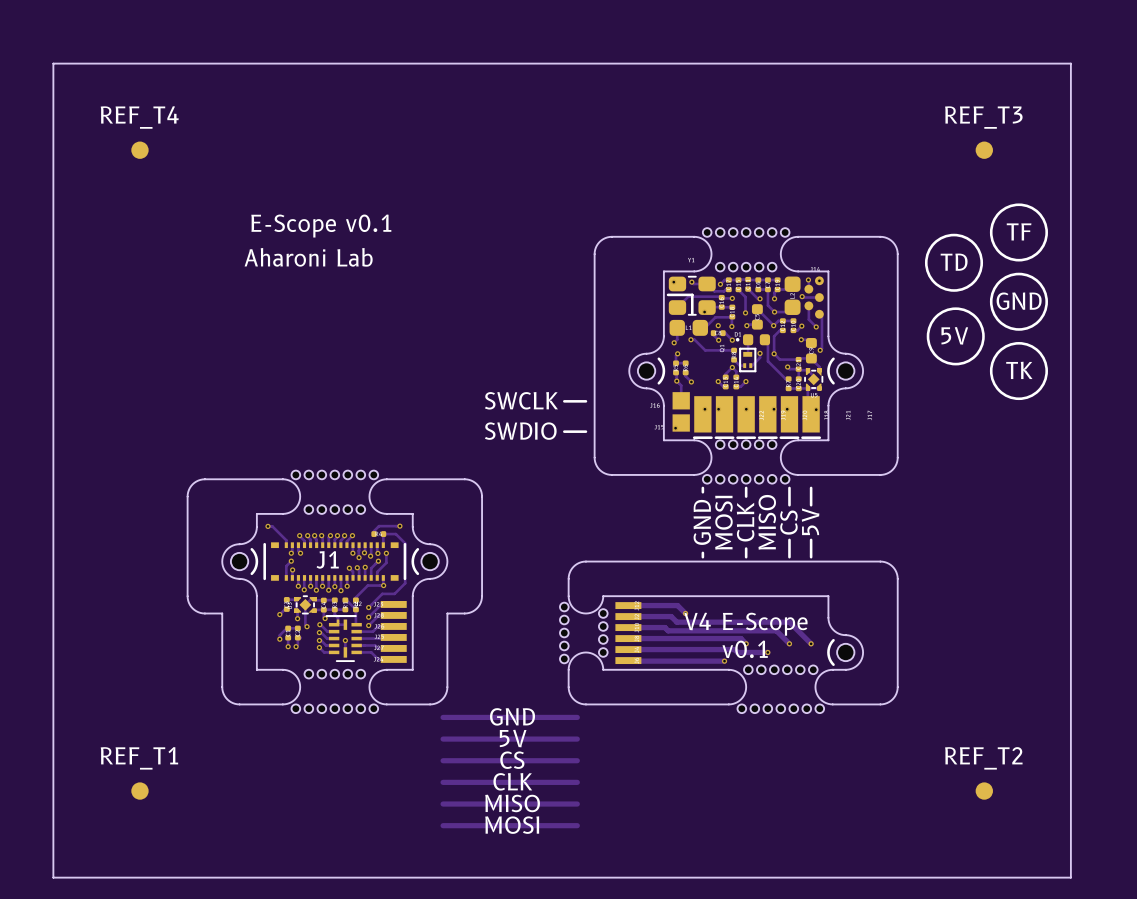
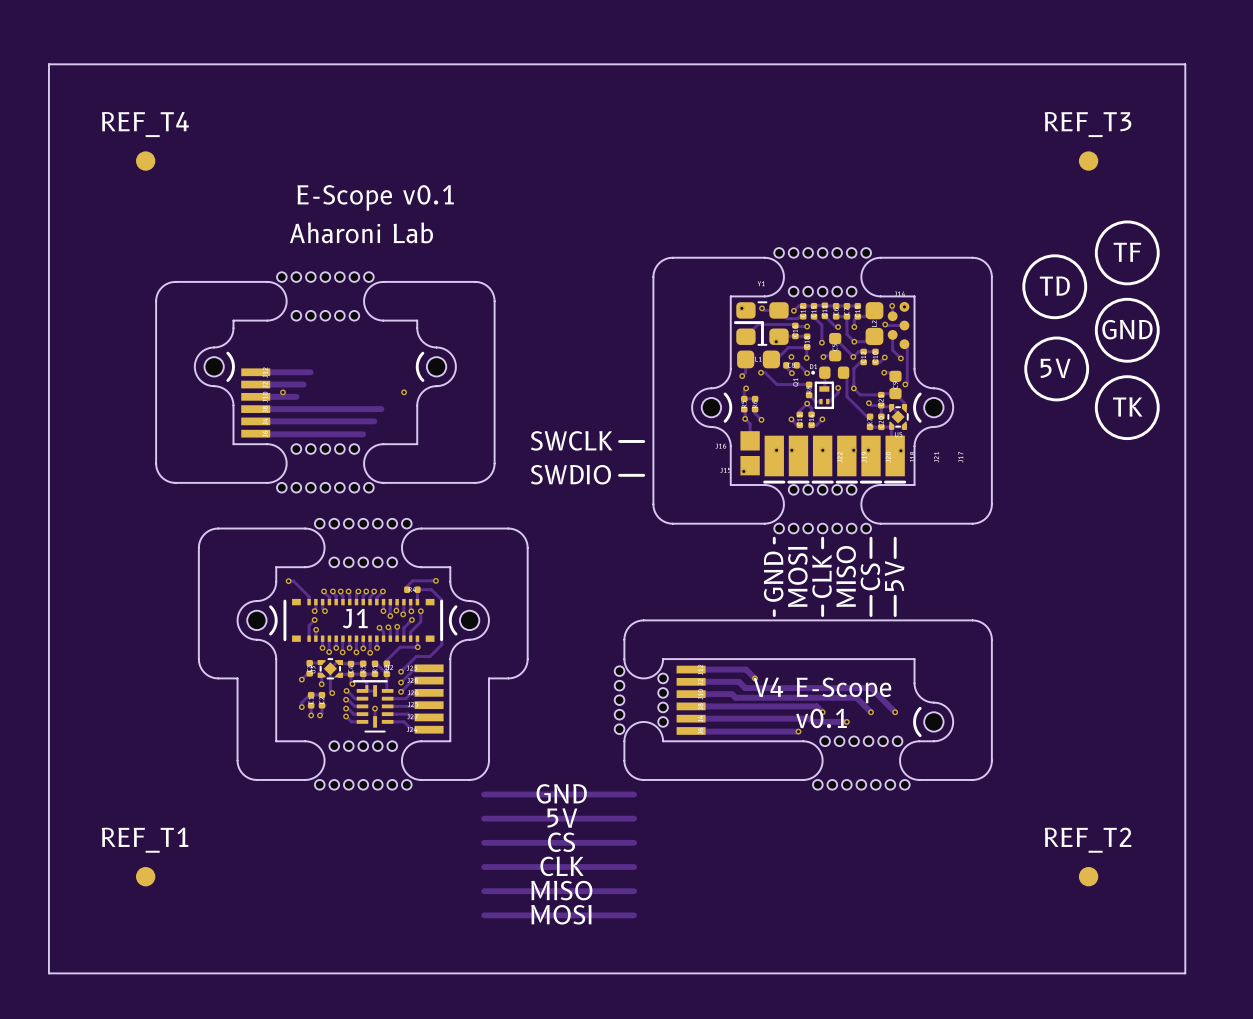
text position: E-Scope v0.1 (321, 226) -> E-Scope v0.1 (375, 197)
part: none -> (281, 277)
part: none -> (296, 277)
part: none -> (310, 277)
part: none -> (325, 277)
part: none -> (339, 277)
part: none -> (354, 277)
part: none -> (368, 277)
text position: Aharoni Lab (308, 257) -> Aharoni Lab (361, 232)
board edge: none -> (175, 281) (269, 282) (279, 285) (284, 291) (286, 306) (279, 316) (269, 320) (233, 320) (232, 333) (229, 339) (221, 346) (202, 351) (196, 359) (194, 366) (196, 374) (202, 382) (221, 387) (230, 395) (233, 405) (233, 444) (269, 444) (282, 451) (286, 458) (286, 468) (277, 480) (267, 482) (175, 482) (165, 480) (158, 473) (156, 463) (156, 298) (161, 287) (175, 281)
board edge: none -> (383, 281) (477, 282) (487, 285) (492, 291) (494, 301) (494, 463) (492, 473) (484, 480) (475, 482) (383, 482) (373, 480) (366, 473) (364, 458) (373, 446) (383, 444) (417, 444) (417, 405) (419, 395) (429, 387) (448, 382) (455, 369) (454, 359) (448, 351) (429, 346) (421, 339) (417, 333) (417, 320) (380, 320) (368, 313) (364, 303) (365, 293) (371, 285) (383, 281)
part: none -> (296, 315)
part: none -> (310, 315)
part: none -> (325, 315)
part: none -> (339, 315)
part: none -> (354, 315)
line: none -> (227, 353) (233, 366) (227, 380)
line: none -> (422, 353) (417, 366) (422, 380)
part: none -> (214, 366)
part: none -> (436, 366)
track: none -> (255, 372) (310, 372)
part: none -> (255, 372)
track: none -> (255, 384) (303, 384)
part: none -> (255, 384)
via: none -> (283, 392)
via: none -> (404, 392)
track: none -> (255, 396) (296, 396)
part: none -> (255, 396)
track: none -> (255, 409) (381, 409)
part: none -> (255, 409)
track: none -> (255, 421) (374, 421)
part: none -> (255, 421)
track: none -> (255, 433) (363, 434)
part: none -> (255, 433)
part: none -> (296, 449)
part: none -> (310, 449)
part: none -> (325, 449)
part: none -> (339, 449)
part: none -> (354, 449)
part: none -> (281, 487)
part: none -> (296, 487)
part: none -> (310, 487)
part: none -> (325, 487)
part: none -> (339, 487)
part: none -> (354, 487)
part: none -> (368, 487)

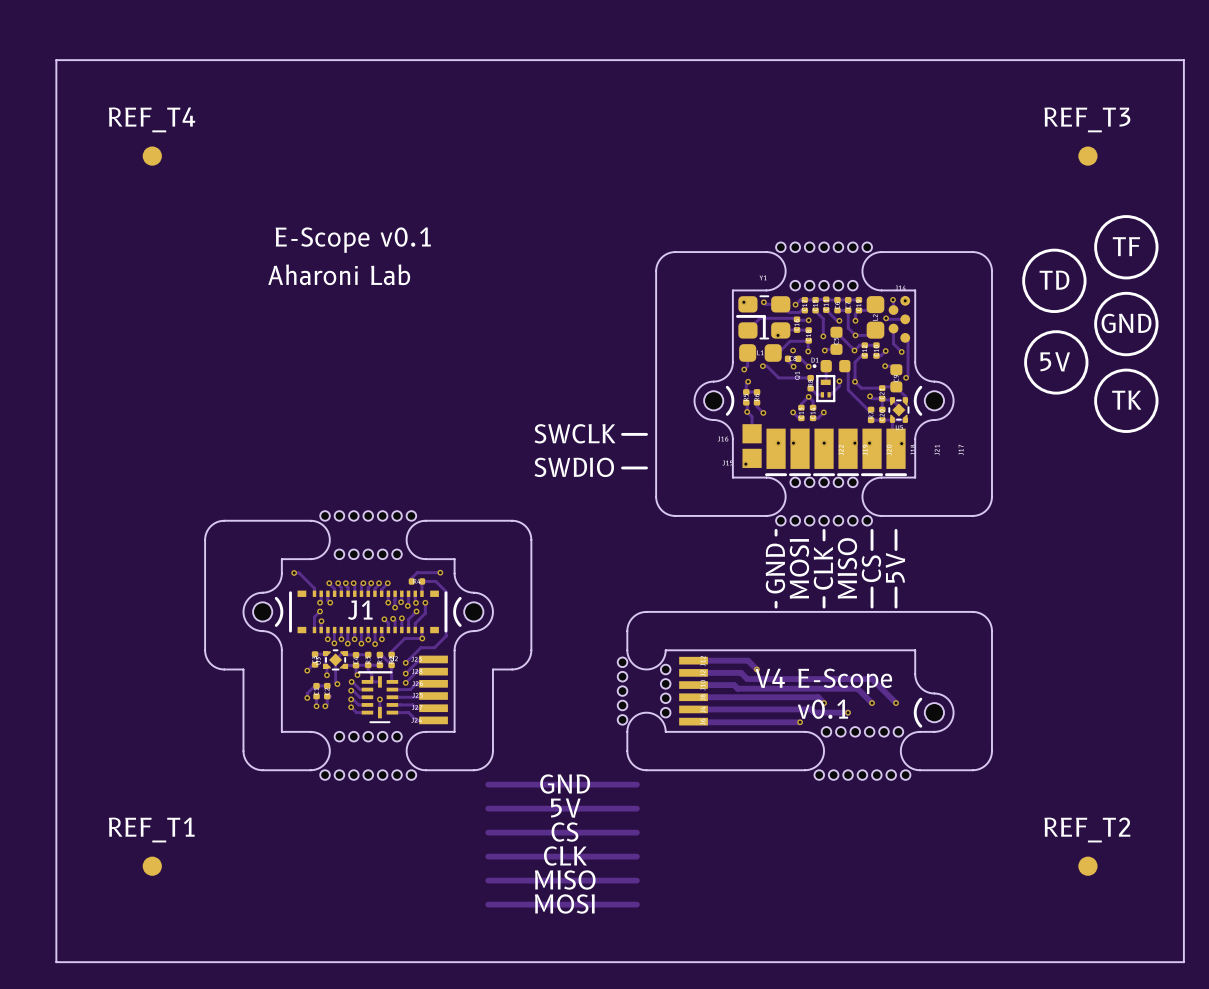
text position: E-Scope v0.1 (375, 197) -> E-Scope v0.1 (353, 240)
text position: Aharoni Lab (361, 232) -> Aharoni Lab (339, 274)
part: (281, 277) -> none
part: (296, 277) -> none
part: (310, 277) -> none
part: (325, 277) -> none
part: (339, 277) -> none
part: (354, 277) -> none
part: (368, 277) -> none
board edge: (175, 281) (269, 282) (279, 285) (284, 291) (286, 306) (279, 316) (269, 320) (233, 320) (232, 333) (229, 339) (221, 346) (202, 351) (196, 359) (194, 366) (196, 374) (202, 382) (221, 387) (230, 395) (233, 405) (233, 444) (269, 444) (282, 451) (286, 458) (286, 468) (277, 480) (267, 482) (175, 482) (165, 480) (158, 473) (156, 463) (156, 298) (161, 287) (175, 281) -> none
board edge: (383, 281) (477, 282) (487, 285) (492, 291) (494, 301) (494, 463) (492, 473) (484, 480) (475, 482) (383, 482) (373, 480) (366, 473) (364, 458) (373, 446) (383, 444) (417, 444) (417, 405) (419, 395) (429, 387) (448, 382) (455, 369) (454, 359) (448, 351) (429, 346) (421, 339) (417, 333) (417, 320) (380, 320) (368, 313) (364, 303) (365, 293) (371, 285) (383, 281) -> none
part: (296, 315) -> none
part: (310, 315) -> none
part: (325, 315) -> none
part: (339, 315) -> none
part: (354, 315) -> none
line: (227, 353) (233, 366) (227, 380) -> none
line: (422, 353) (417, 366) (422, 380) -> none
part: (214, 366) -> none
part: (436, 366) -> none
track: (255, 372) (310, 372) -> none
part: (255, 372) -> none
track: (255, 384) (303, 384) -> none
part: (255, 384) -> none
via: (283, 392) -> none
via: (404, 392) -> none
track: (255, 396) (296, 396) -> none
part: (255, 396) -> none
track: (255, 409) (381, 409) -> none
part: (255, 409) -> none
track: (255, 421) (374, 421) -> none
part: (255, 421) -> none
track: (255, 433) (363, 434) -> none
part: (255, 433) -> none
part: (296, 449) -> none
part: (310, 449) -> none
part: (325, 449) -> none
part: (339, 449) -> none
part: (354, 449) -> none
part: (281, 487) -> none
part: (296, 487) -> none
part: (310, 487) -> none
part: (325, 487) -> none
part: (339, 487) -> none
part: (354, 487) -> none
part: (368, 487) -> none

